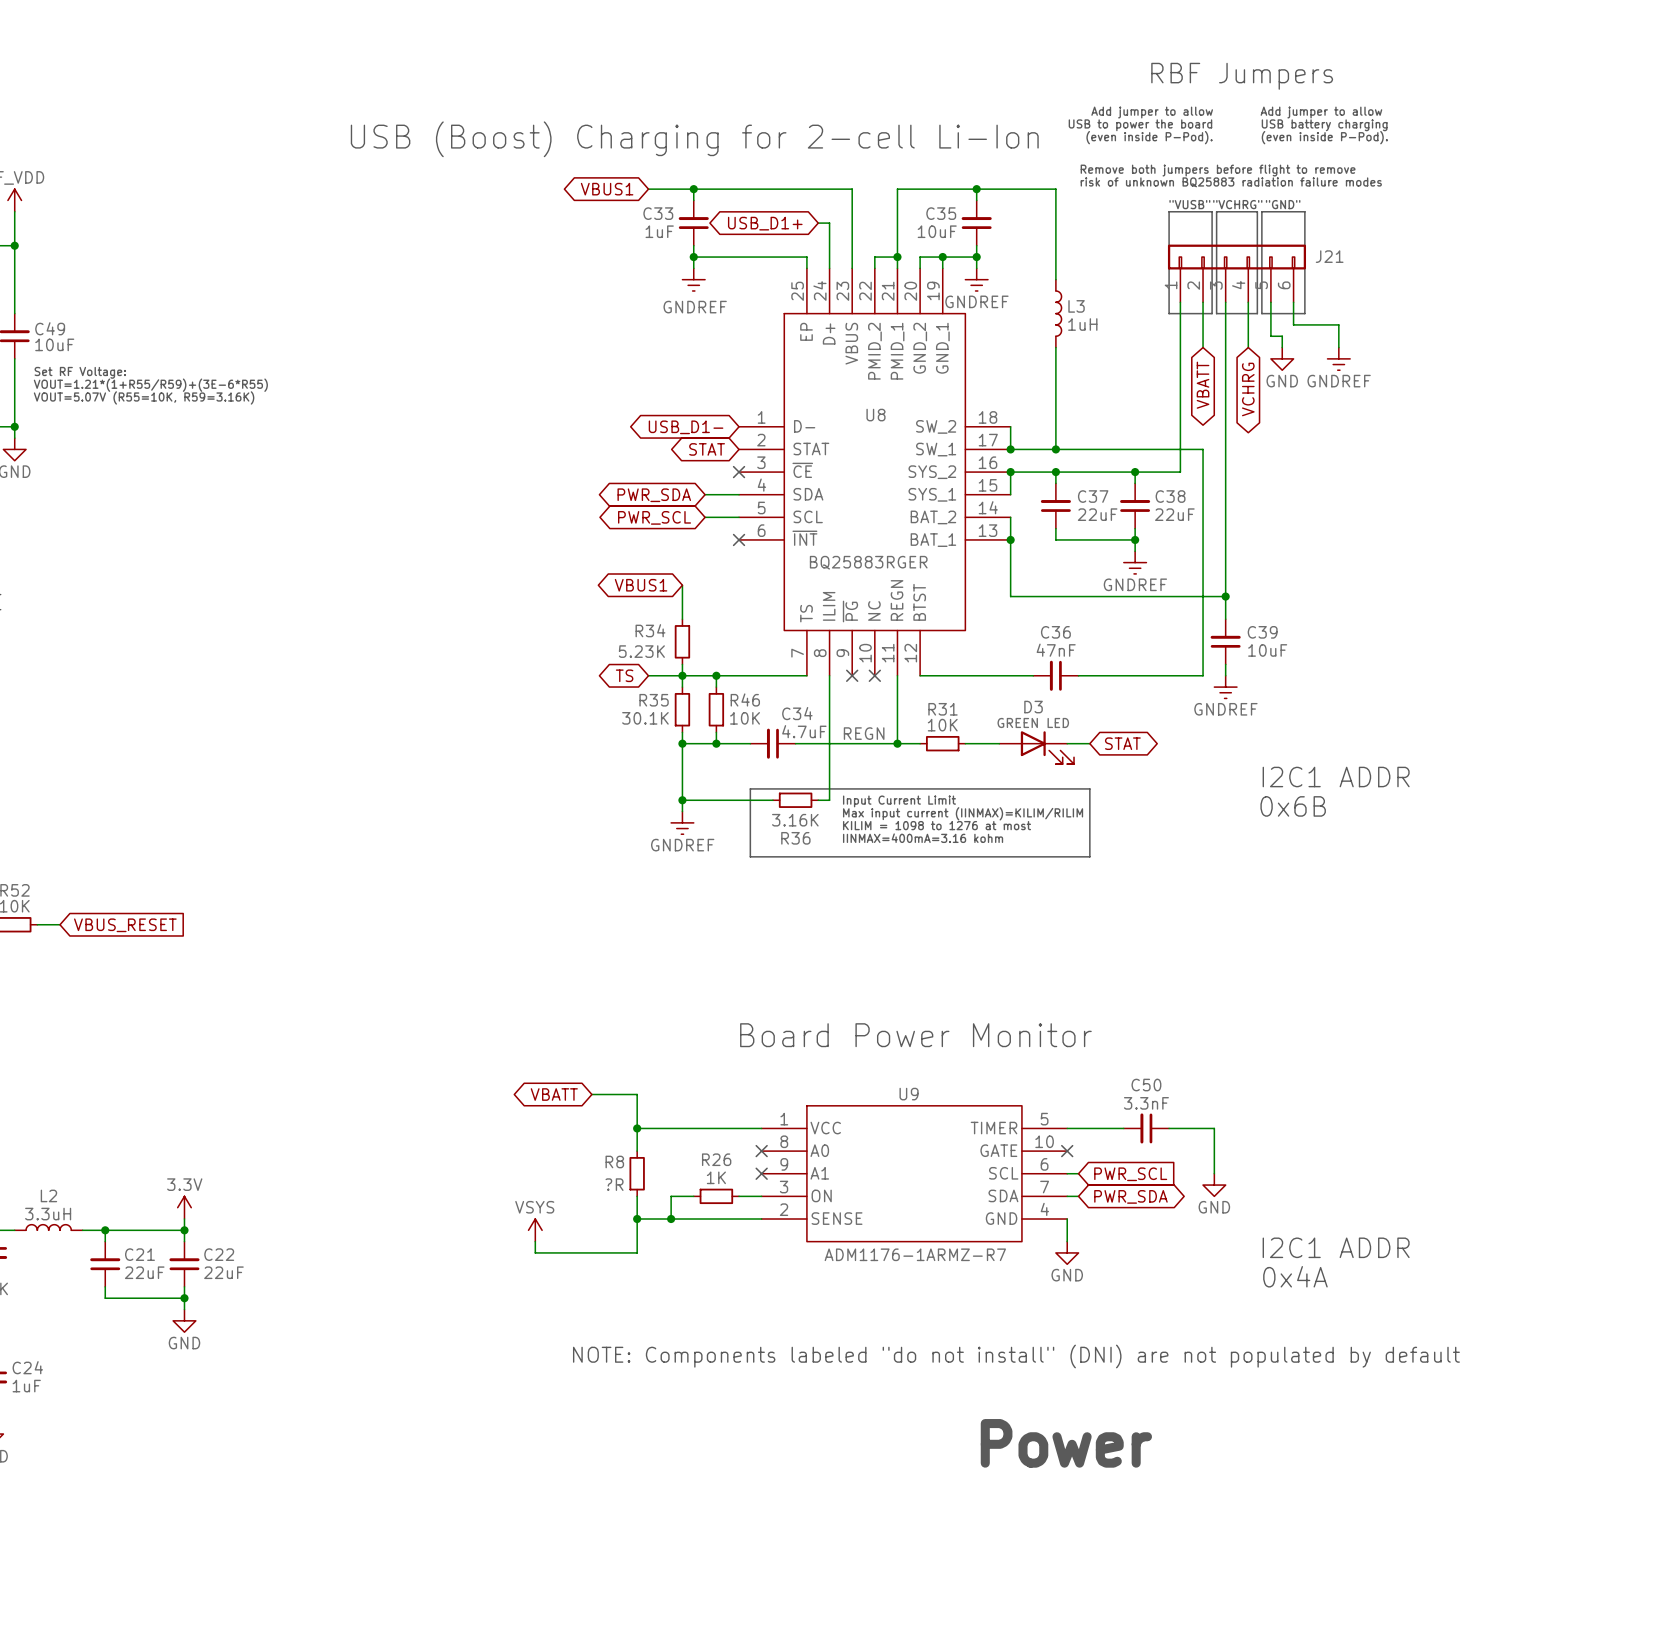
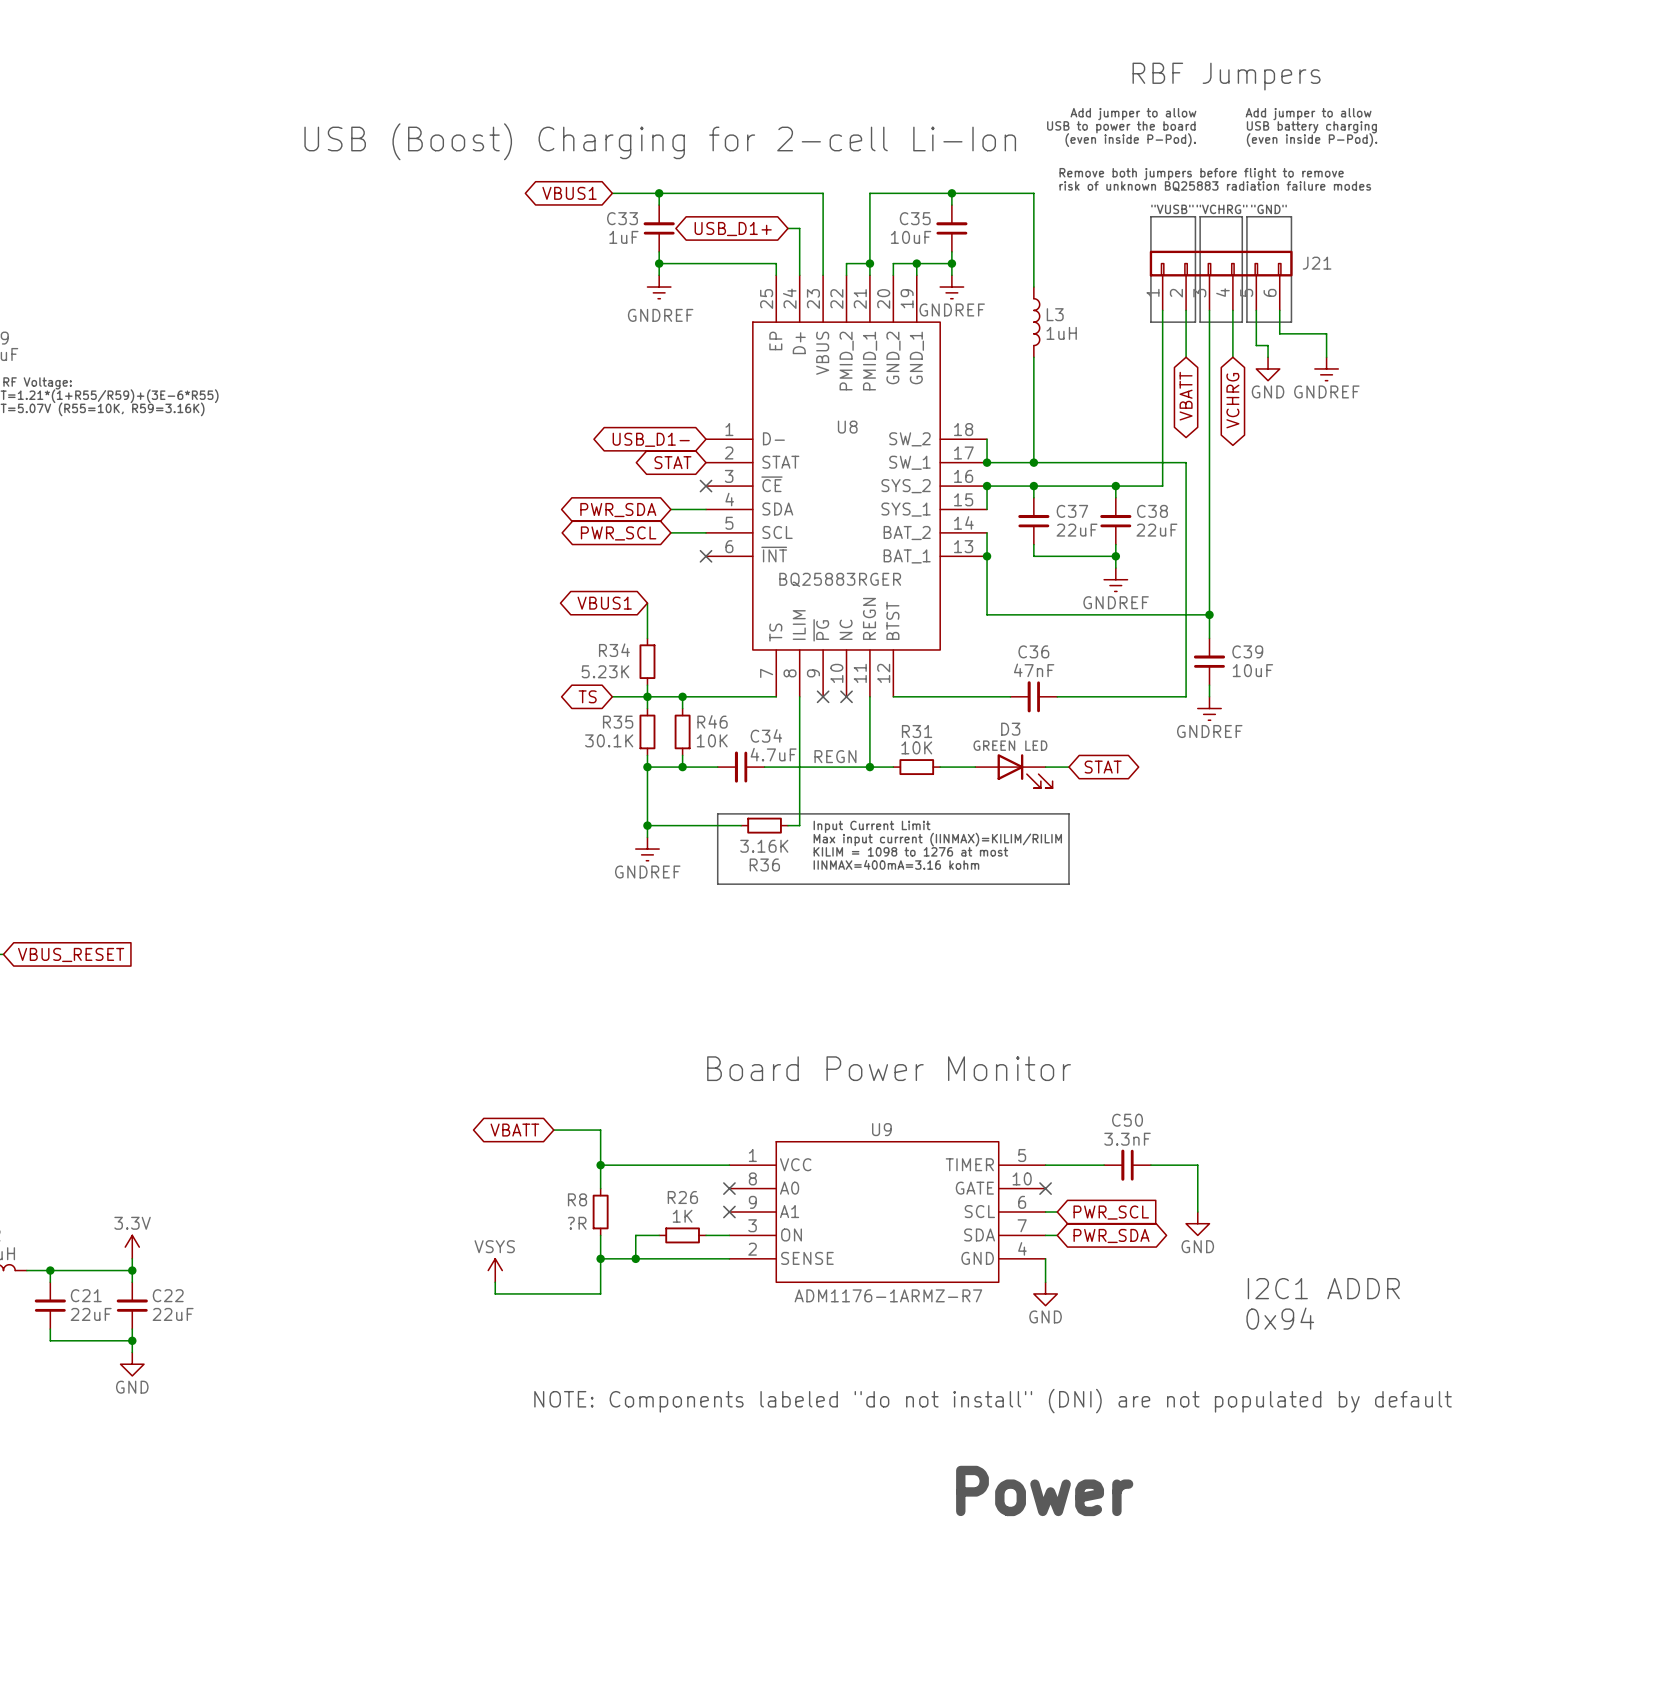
text: I2C1 ADDR (1336, 777) -> none
text: 0x6B (1293, 806) -> none
text: 0x4A (1295, 1276) -> 0x94 (1280, 1318)

